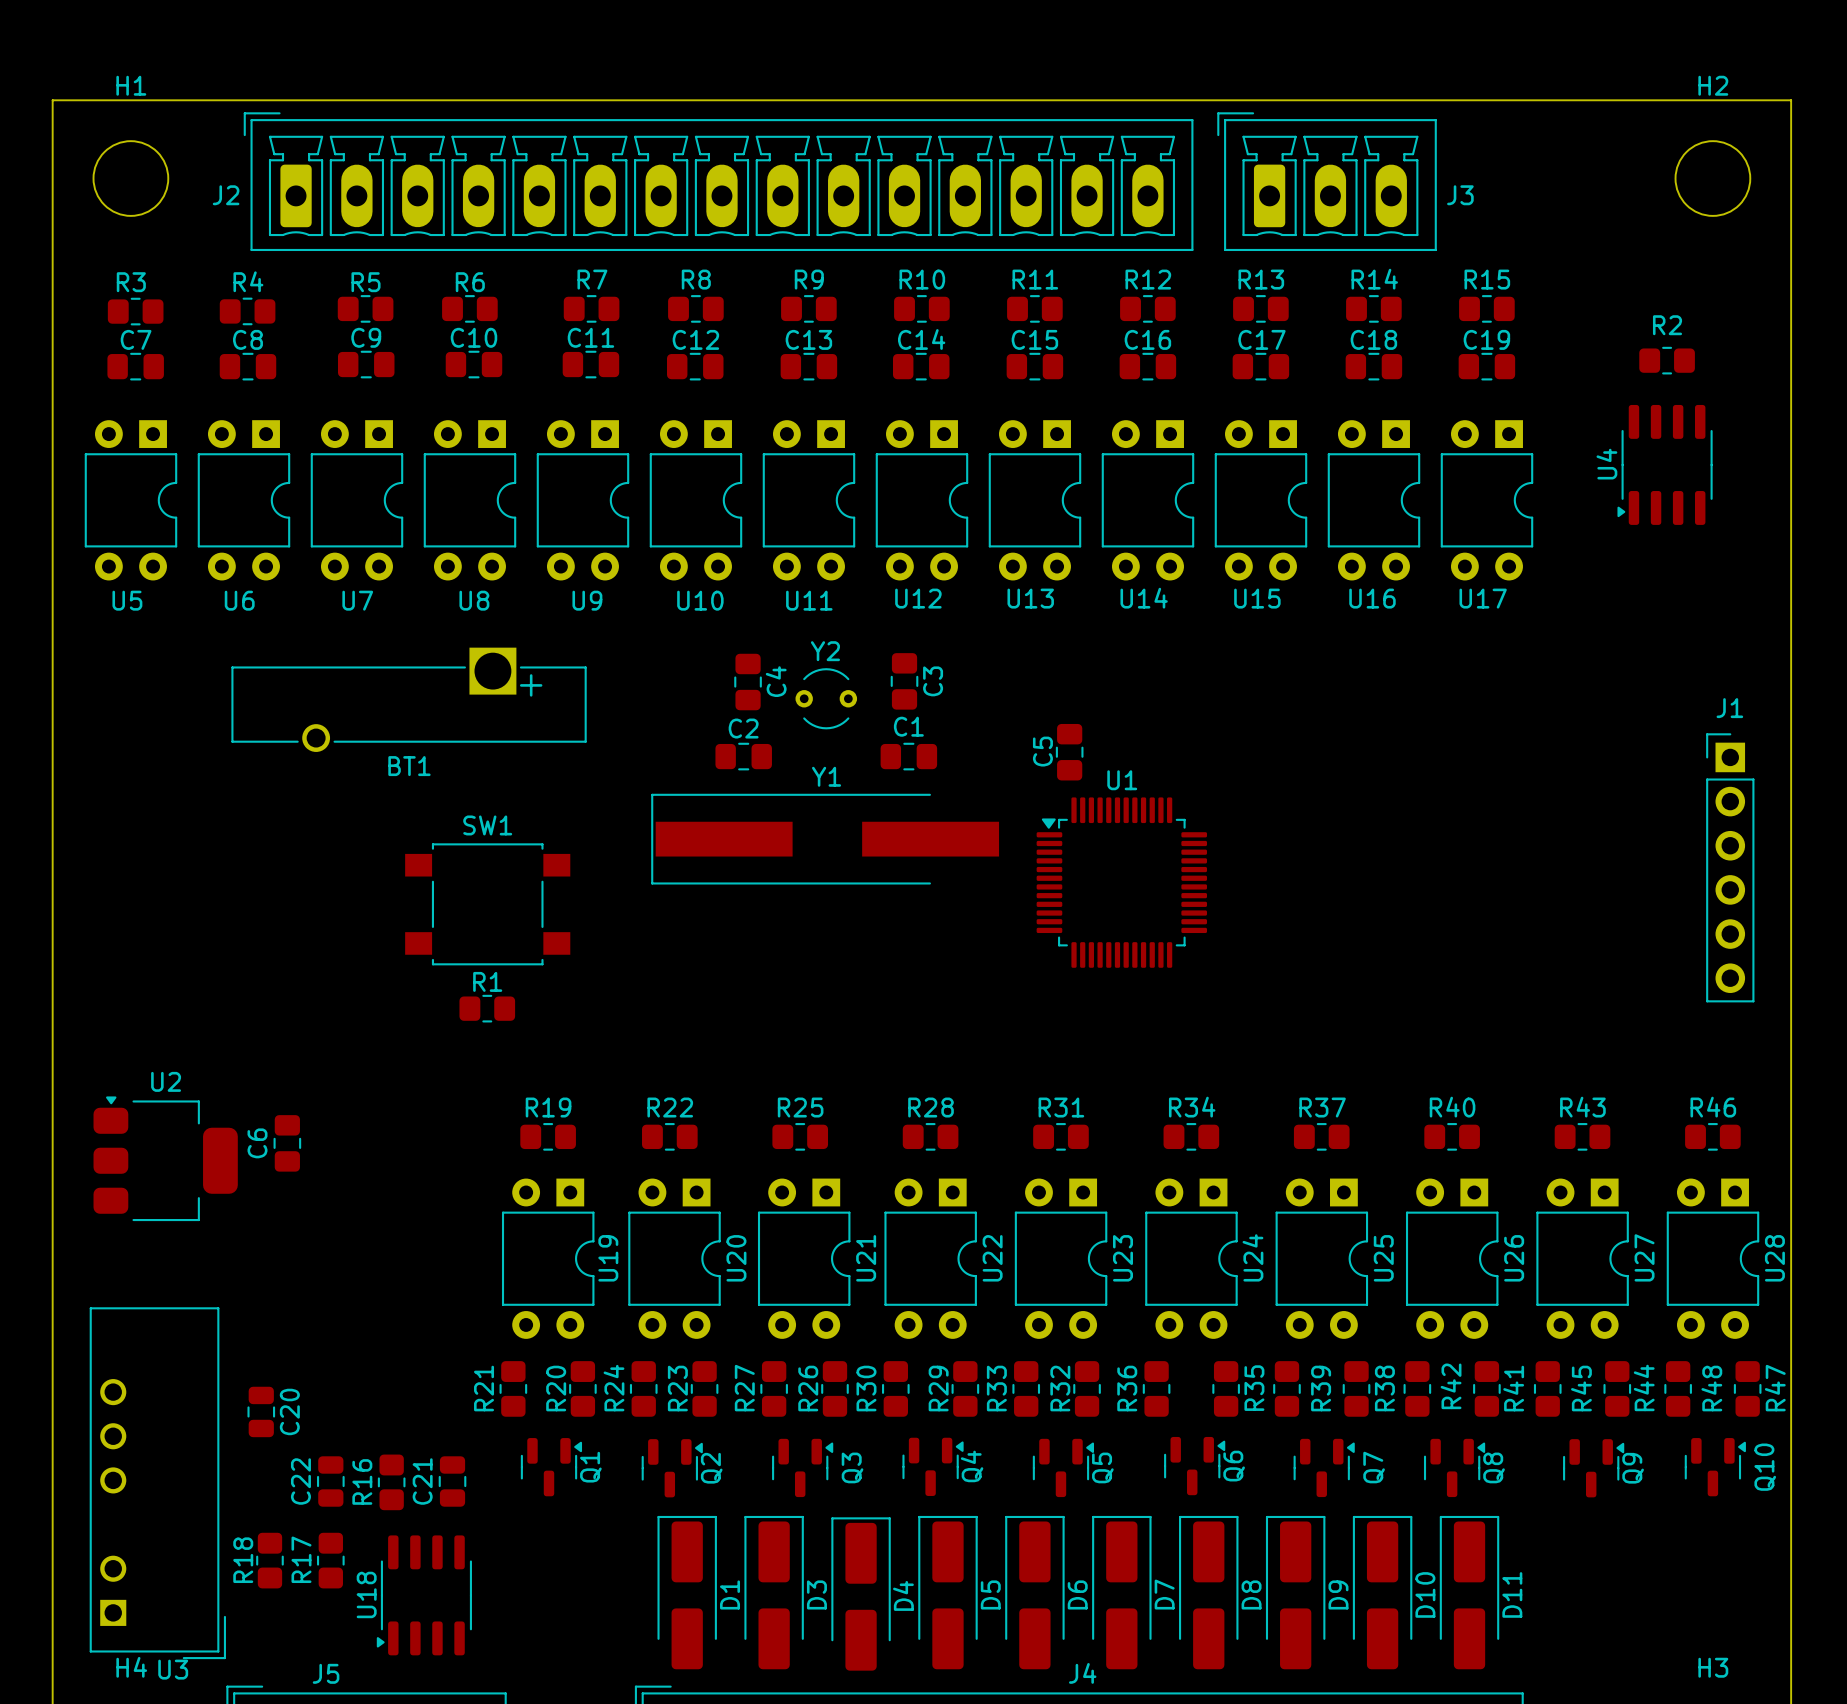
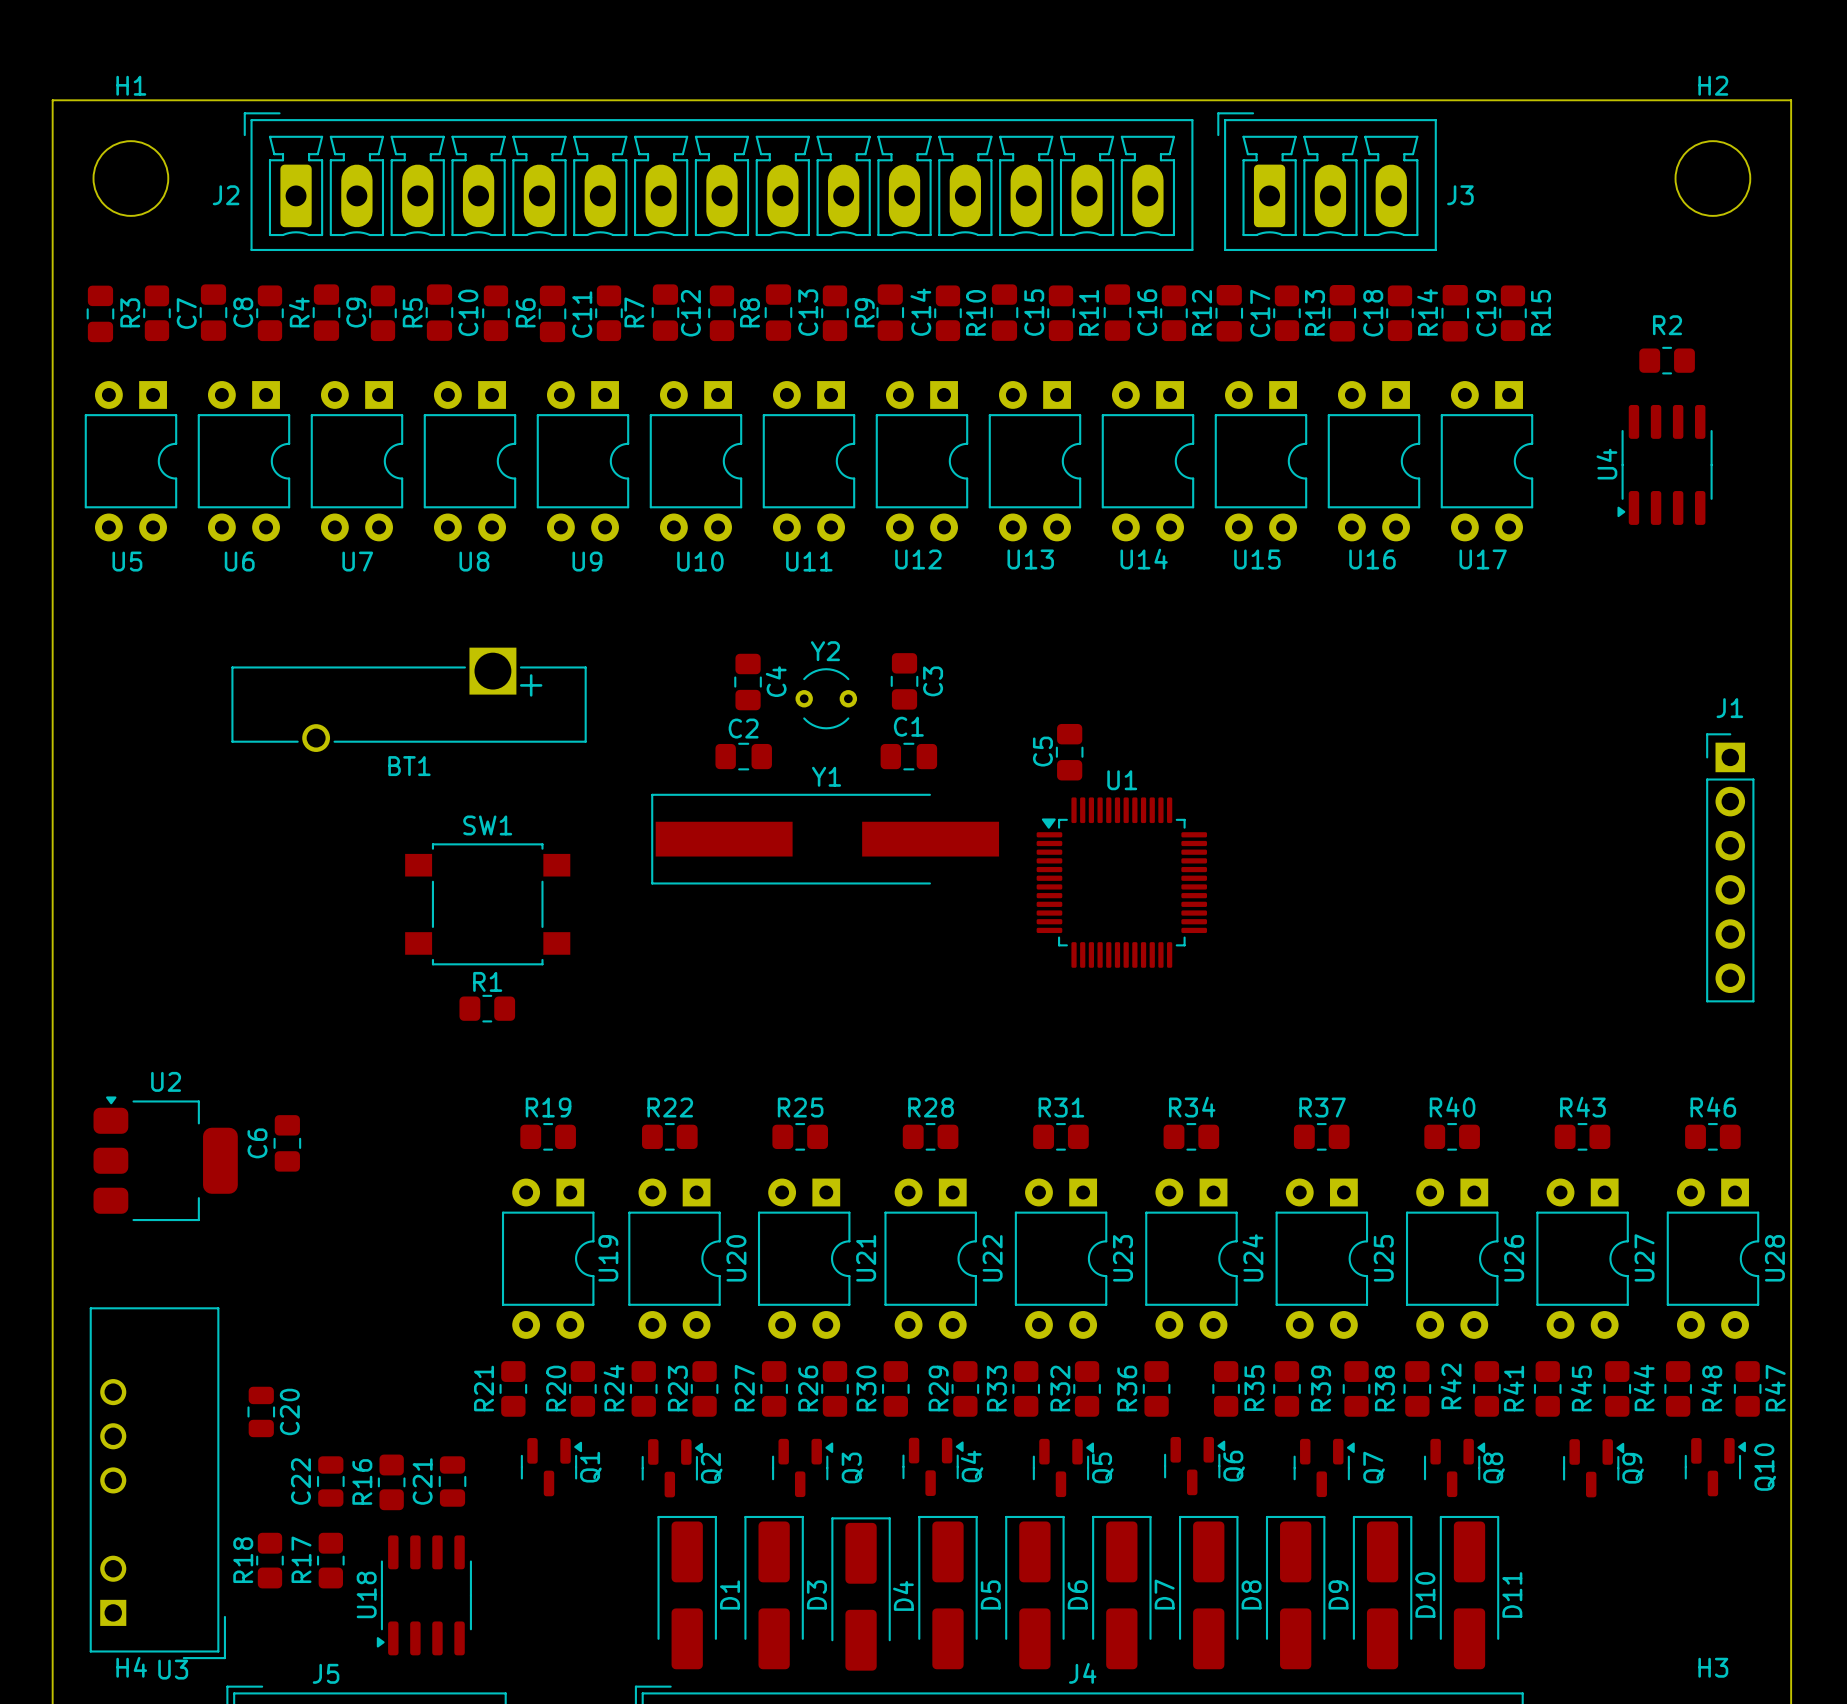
R3 name position: R3 (131, 282) -> R3 (130, 312)
R5 rotation: 0° (365, 308) -> 90° clockwise (382, 313)
R6 rotation: 0° (469, 308) -> 90° clockwise (495, 313)
R7 rotation: 0° (591, 308) -> 90° clockwise (608, 313)
R8 rotation: 0° (695, 308) -> 90° clockwise (721, 313)
R9 rotation: 0° (808, 308) -> 90° clockwise (834, 313)
R10 rotation: 0° (921, 308) -> 90° clockwise (947, 313)
R11 rotation: 0° (1034, 308) -> 90° clockwise (1060, 313)
R12 rotation: 0° (1147, 308) -> 90° clockwise (1173, 313)
R13 rotation: 0° (1260, 308) -> 90° clockwise (1286, 313)
R14 rotation: 0° (1373, 308) -> 90° clockwise (1399, 313)
R15 rotation: 0° (1486, 308) -> 90° clockwise (1512, 313)
R3 rotation: 0° (135, 311) -> 90° clockwise (156, 313)
R4 rotation: 0° (247, 311) -> 90° clockwise (269, 313)
C7 name position: C7 (136, 339) -> C7 (186, 313)
C9 rotation: 0° (366, 364) -> 90° clockwise (326, 312)
C9 position: (366, 364) -> (326, 312)
C10 rotation: 0° (473, 364) -> 90° clockwise (439, 312)
C10 position: (473, 364) -> (439, 312)
C11 rotation: 0° (590, 364) -> 90° clockwise (552, 313)
C11 position: (590, 364) -> (552, 313)
C7 rotation: 0° (135, 366) -> 90° clockwise (100, 313)
C7 position: (135, 366) -> (100, 313)
C8 rotation: 0° (247, 366) -> 90° clockwise (213, 312)
C8 position: (247, 366) -> (213, 312)
C12 rotation: 0° (695, 366) -> 90° clockwise (665, 312)
C12 position: (695, 366) -> (665, 312)
C13 rotation: 0° (808, 366) -> 90° clockwise (778, 312)
C13 position: (808, 366) -> (778, 312)
C14 rotation: 0° (921, 366) -> 90° clockwise (890, 312)
C14 position: (921, 366) -> (890, 312)
C15 rotation: 0° (1034, 366) -> 90° clockwise (1004, 312)
C15 position: (1034, 366) -> (1004, 312)
C16 rotation: 0° (1147, 366) -> 90° clockwise (1117, 312)
C16 position: (1147, 366) -> (1117, 312)
C17 rotation: 0° (1260, 366) -> 90° clockwise (1229, 313)
C17 position: (1260, 366) -> (1229, 313)
C18 rotation: 0° (1373, 366) -> 90° clockwise (1342, 313)
C18 position: (1373, 366) -> (1342, 313)
C19 rotation: 0° (1486, 366) -> 90° clockwise (1455, 313)
C19 position: (1486, 366) -> (1455, 313)
U5 position: (130, 500) -> (130, 461)
U6 position: (243, 500) -> (243, 461)
U7 position: (356, 500) -> (356, 461)
U8 position: (469, 500) -> (469, 461)
U9 position: (582, 500) -> (582, 461)
U10 position: (695, 500) -> (695, 461)
U11 position: (808, 500) -> (808, 461)
U12 position: (921, 500) -> (921, 461)
U13 position: (1034, 500) -> (1034, 461)
U14 position: (1147, 500) -> (1147, 461)
U15 position: (1260, 500) -> (1260, 461)
U16 position: (1373, 500) -> (1373, 461)
U17 position: (1486, 500) -> (1486, 461)

